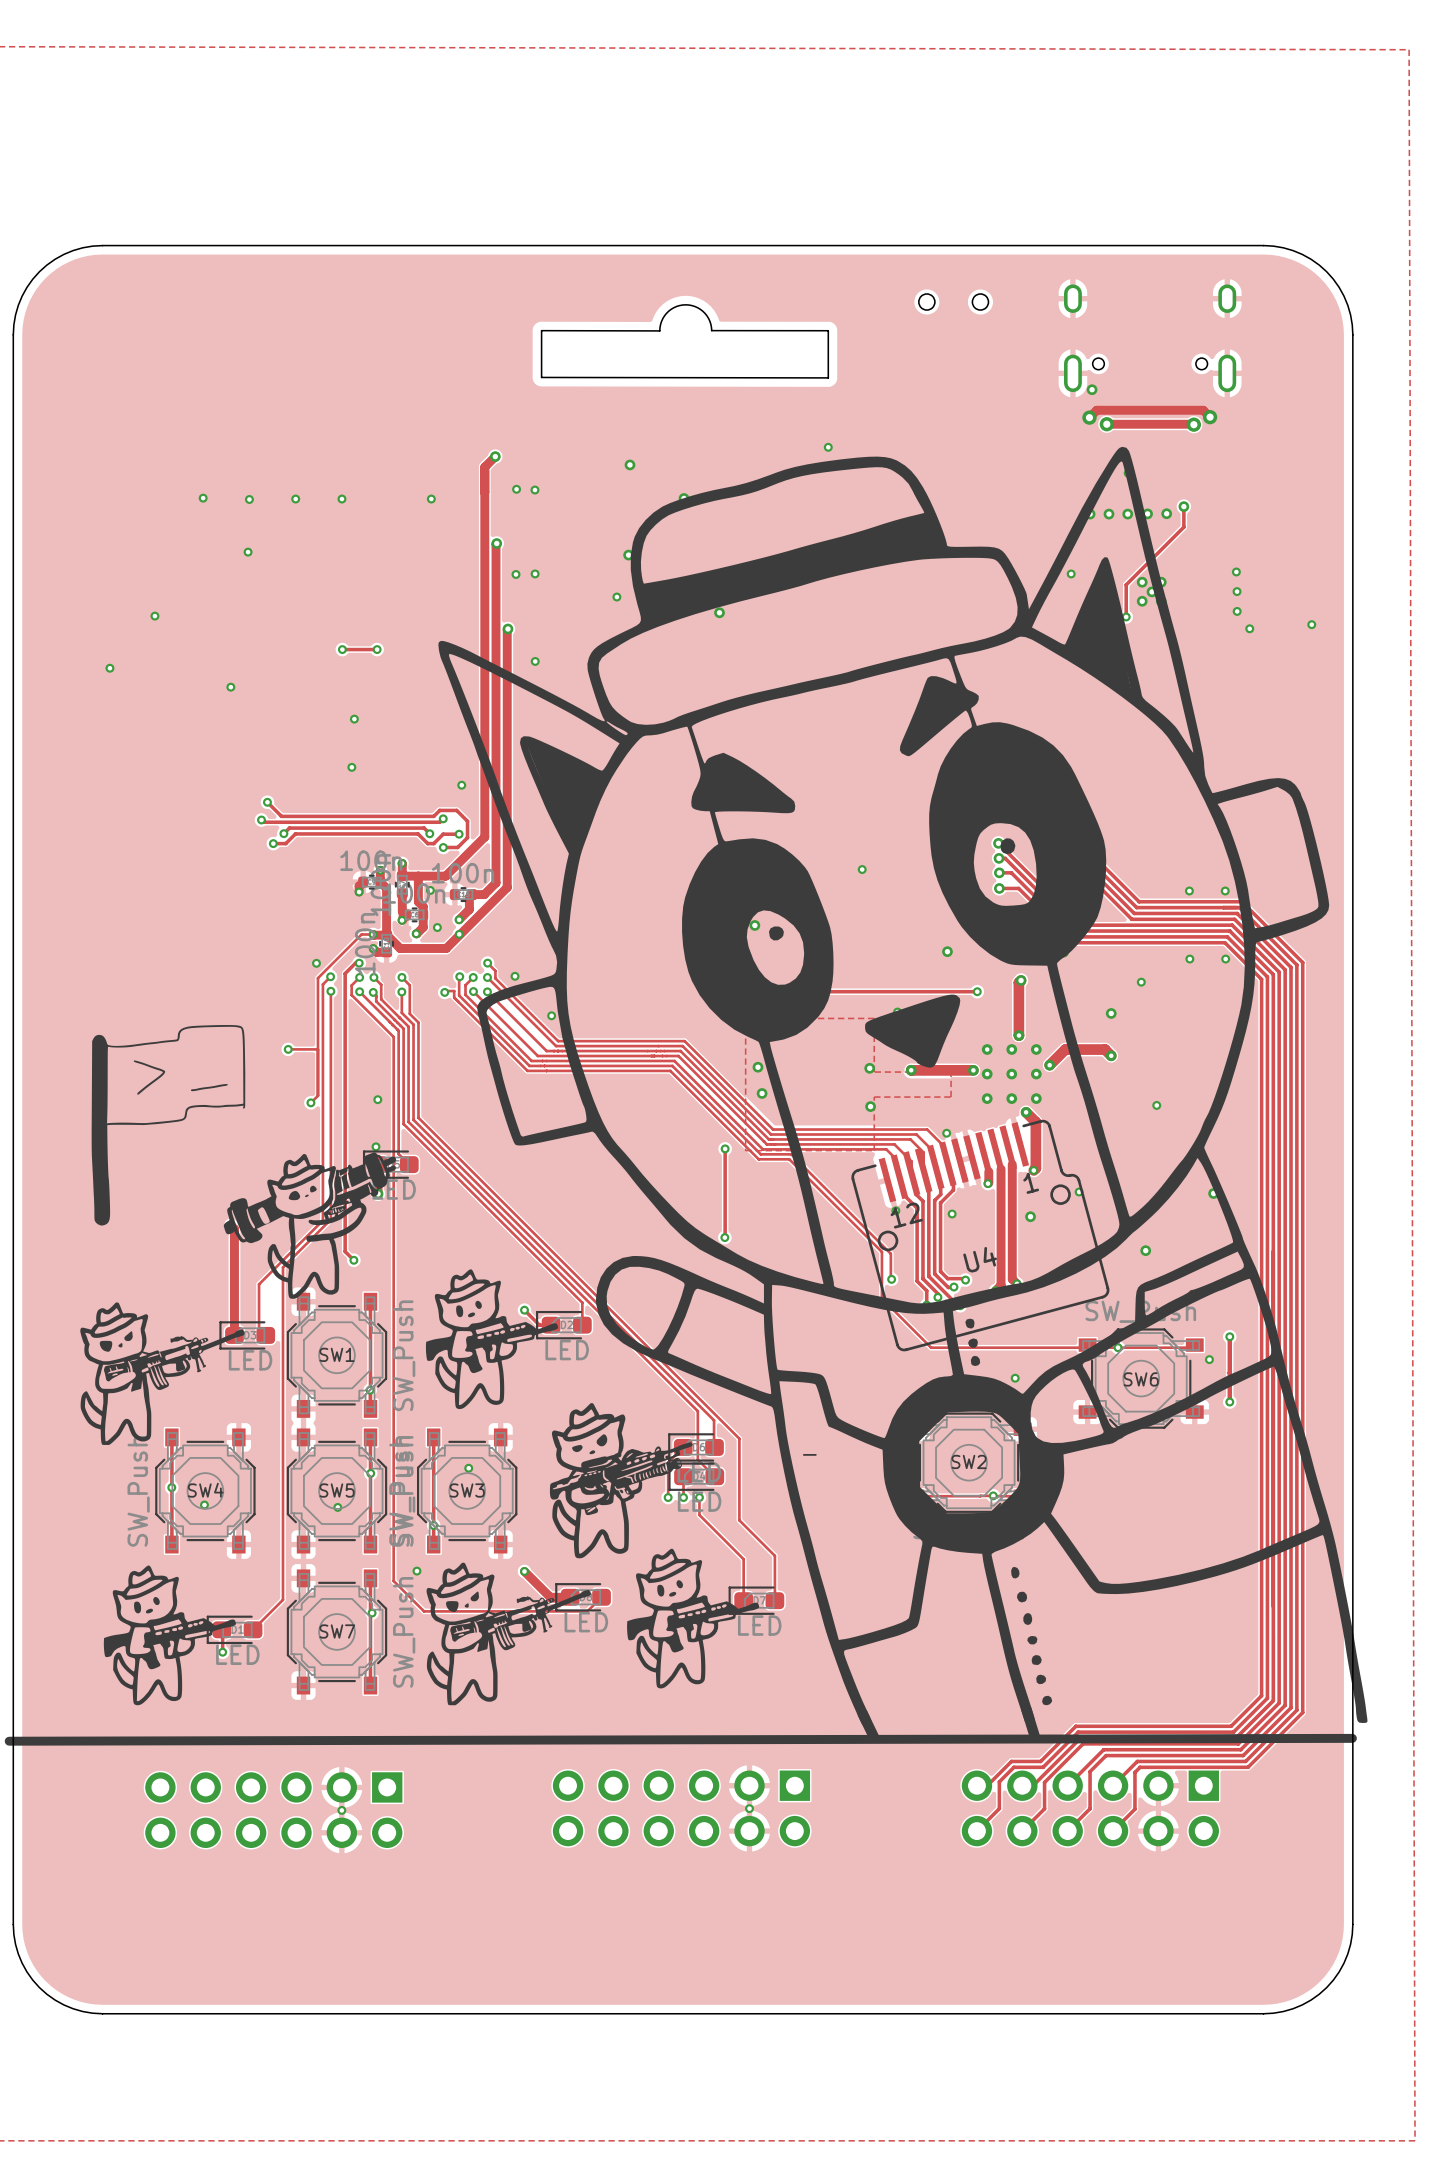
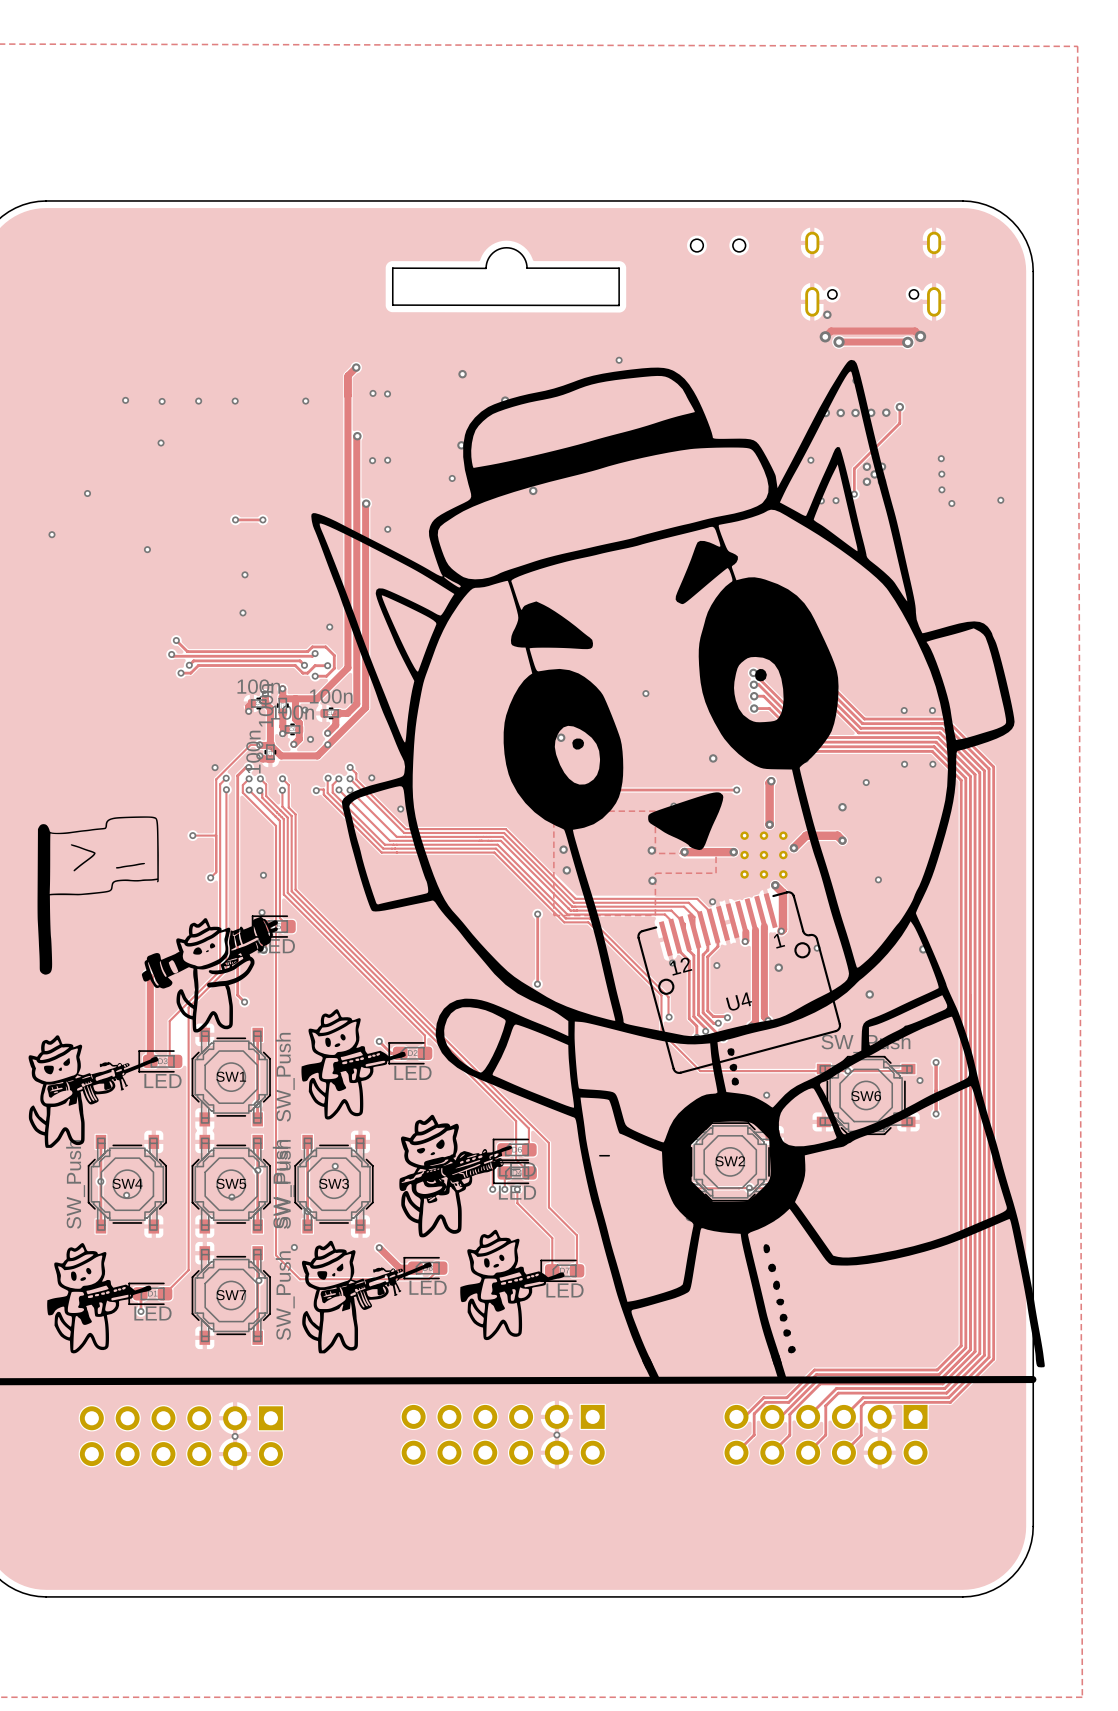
drawing: [1069, 569, 1131, 691] -> none
drawing: [524, 739, 605, 852] -> none

